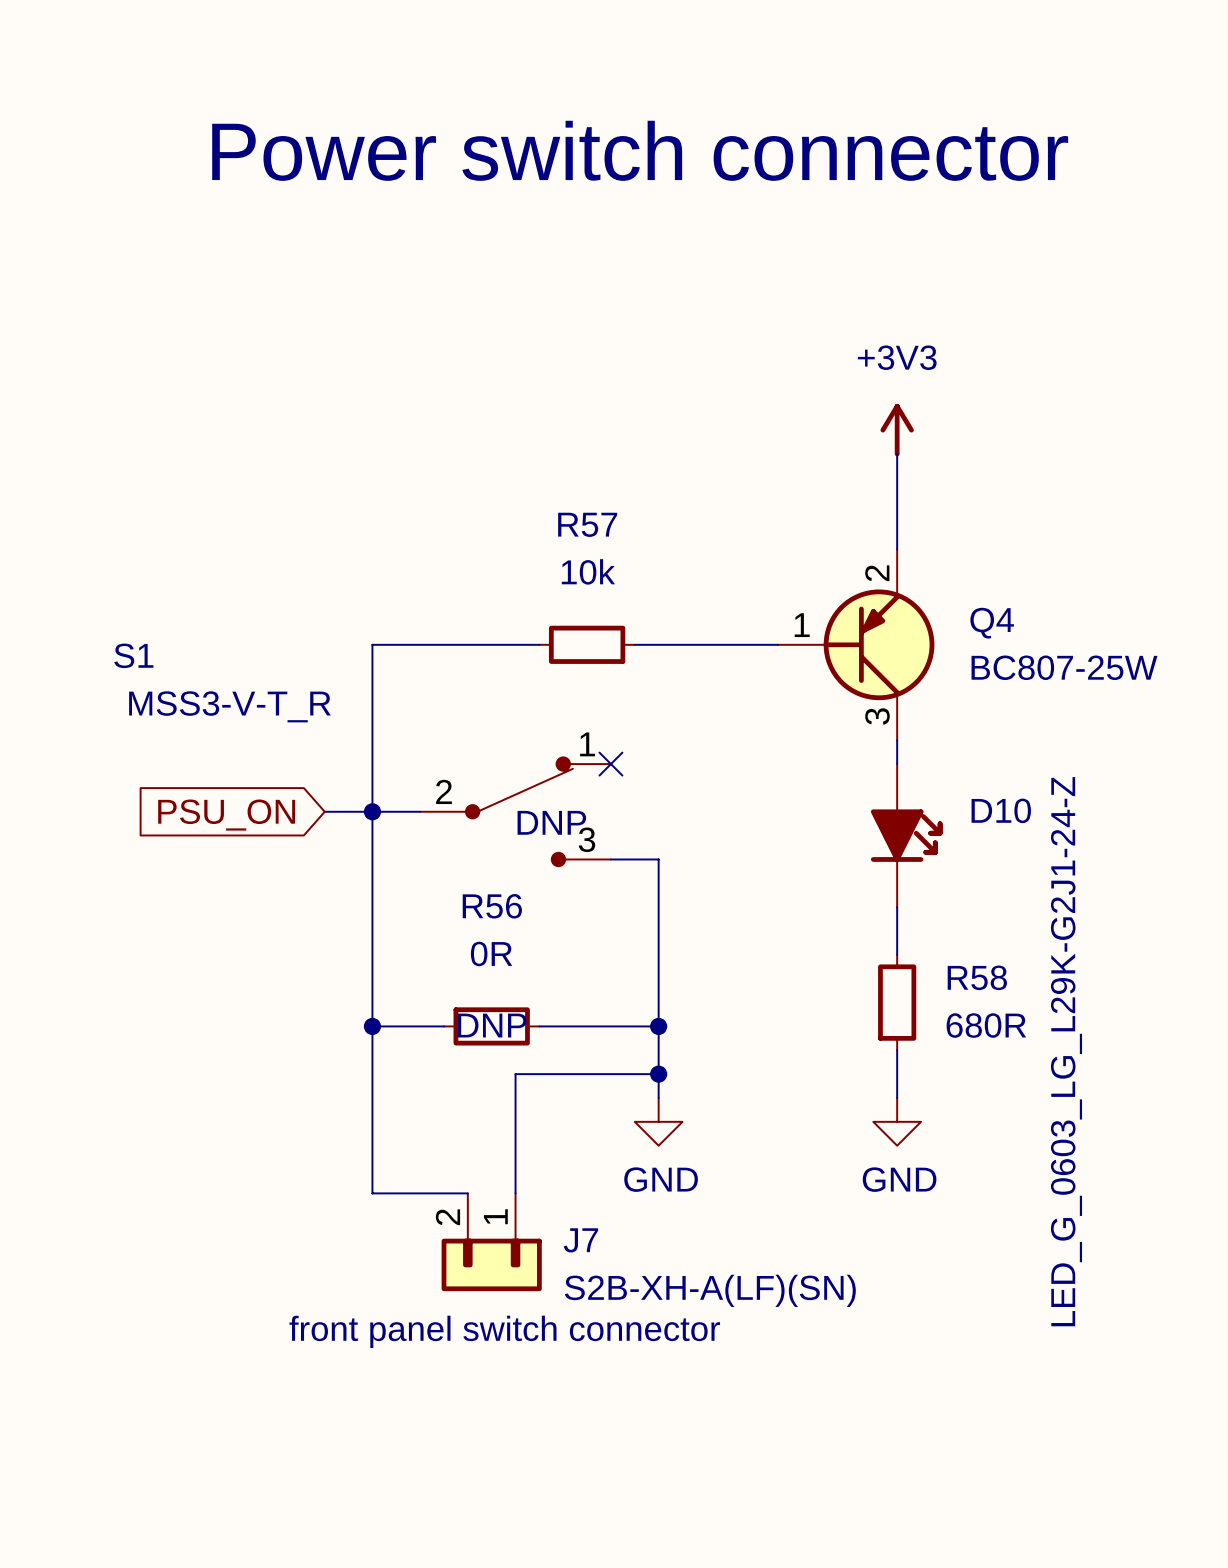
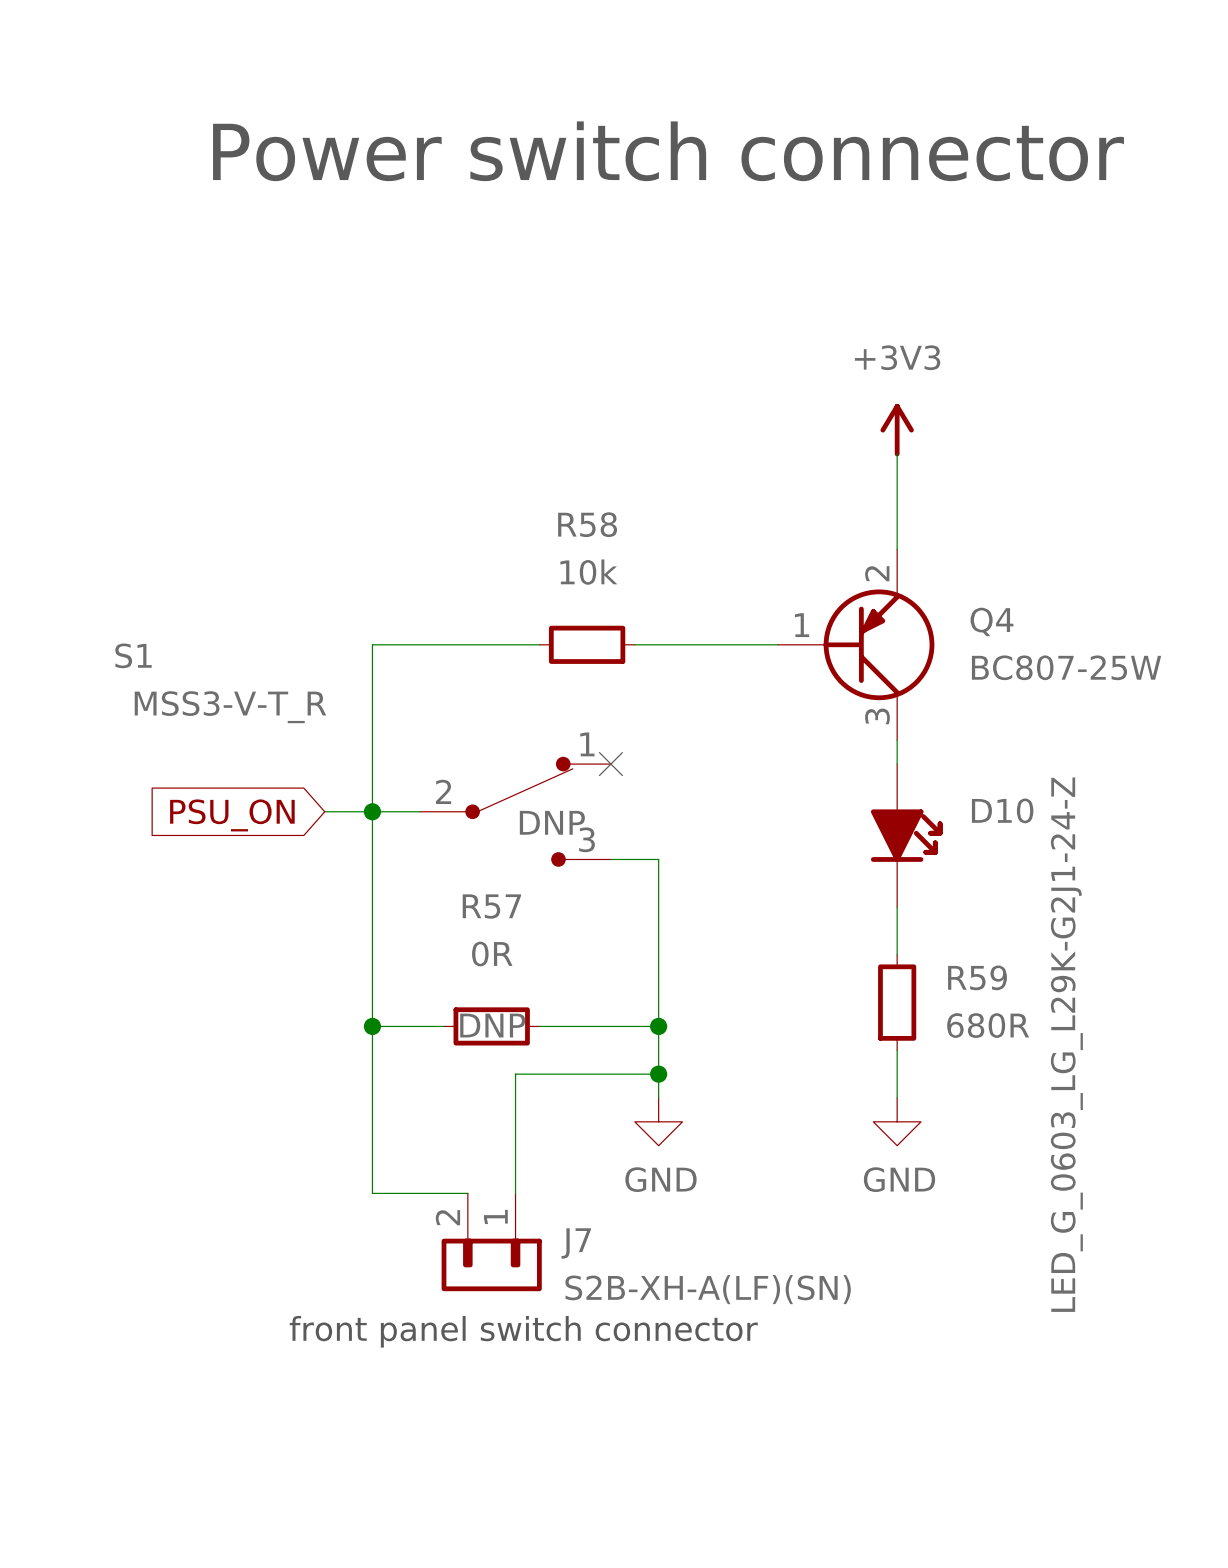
R57 name: R57 (587, 524) -> R58 (587, 524)
R56 name: R56 (492, 906) -> R57 (491, 906)
R58 name: R58 (977, 977) -> R59 (977, 977)

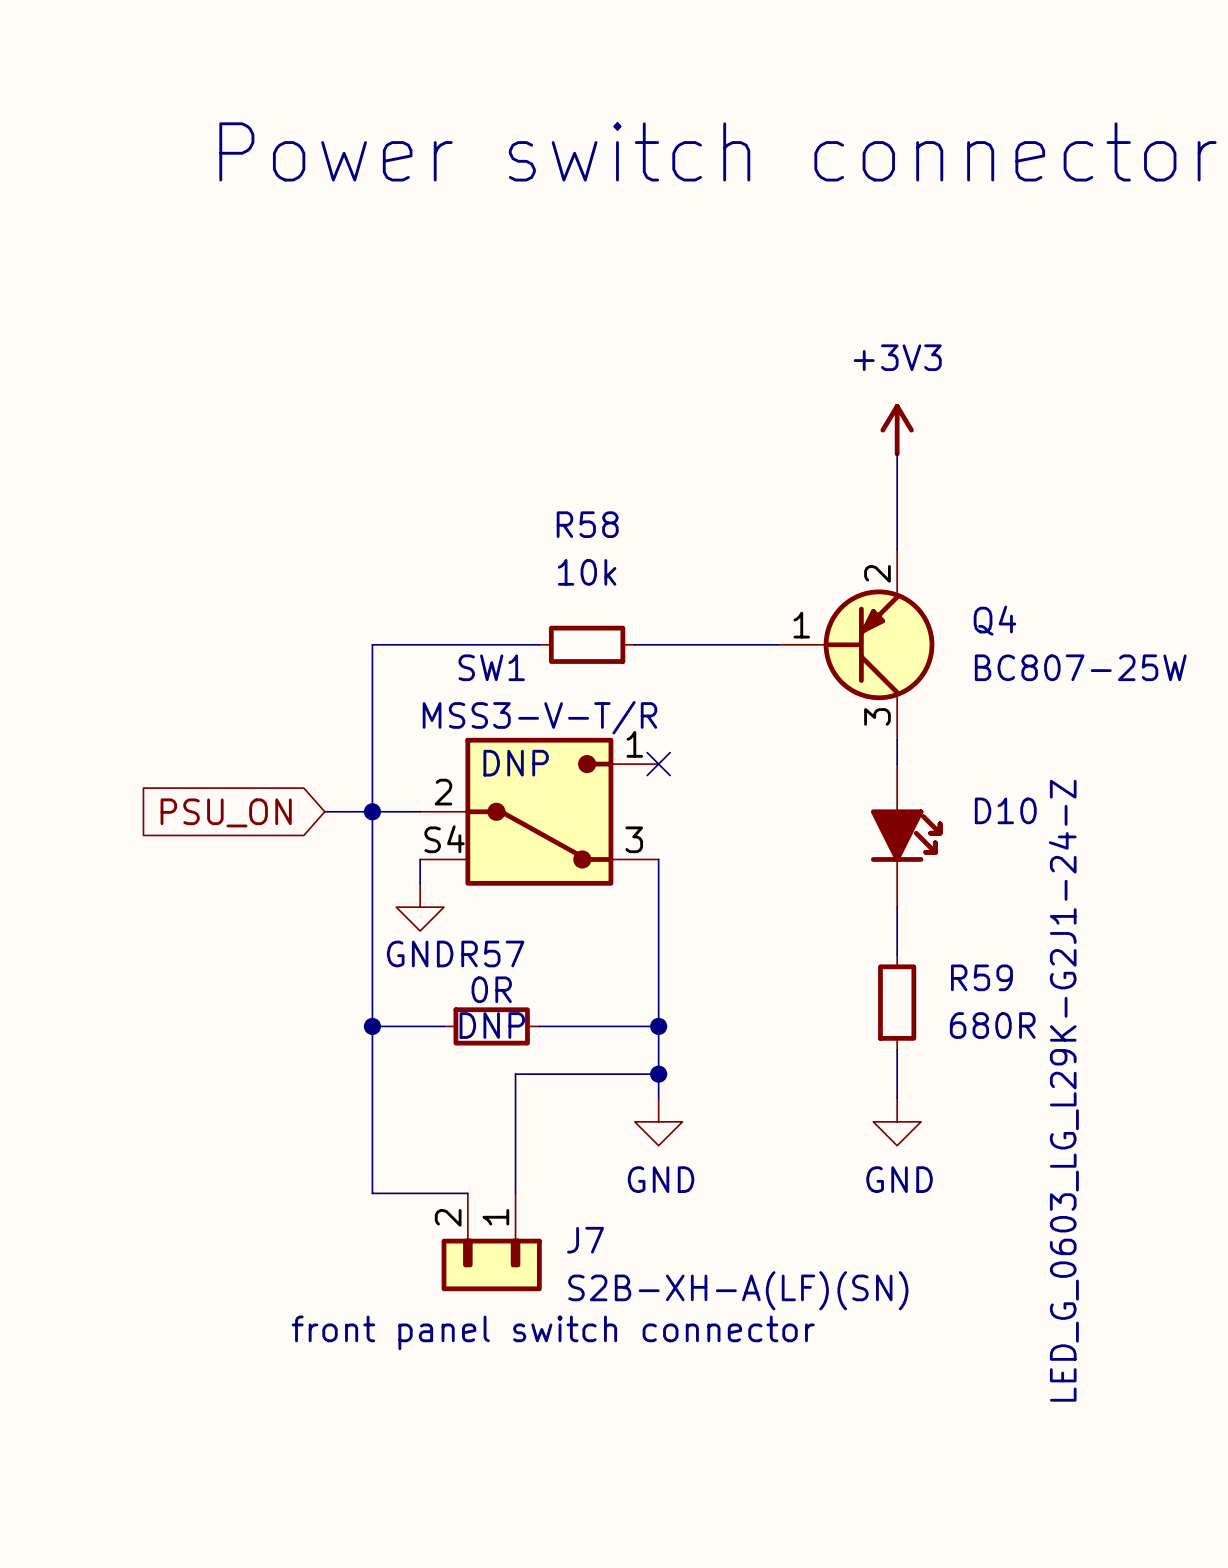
no-connect mark position: (610, 764) -> (658, 764)
S1: MSS3-V-T_R (515, 811) -> none
SW1: none -> (539, 811)
wire: none -> (420, 859) (420, 883)
R57 name position: R57 (491, 906) -> R57 (492, 953)
power symbol: none -> GND (420, 907)
R57 text position: 0R (492, 954) -> 0R (491, 989)

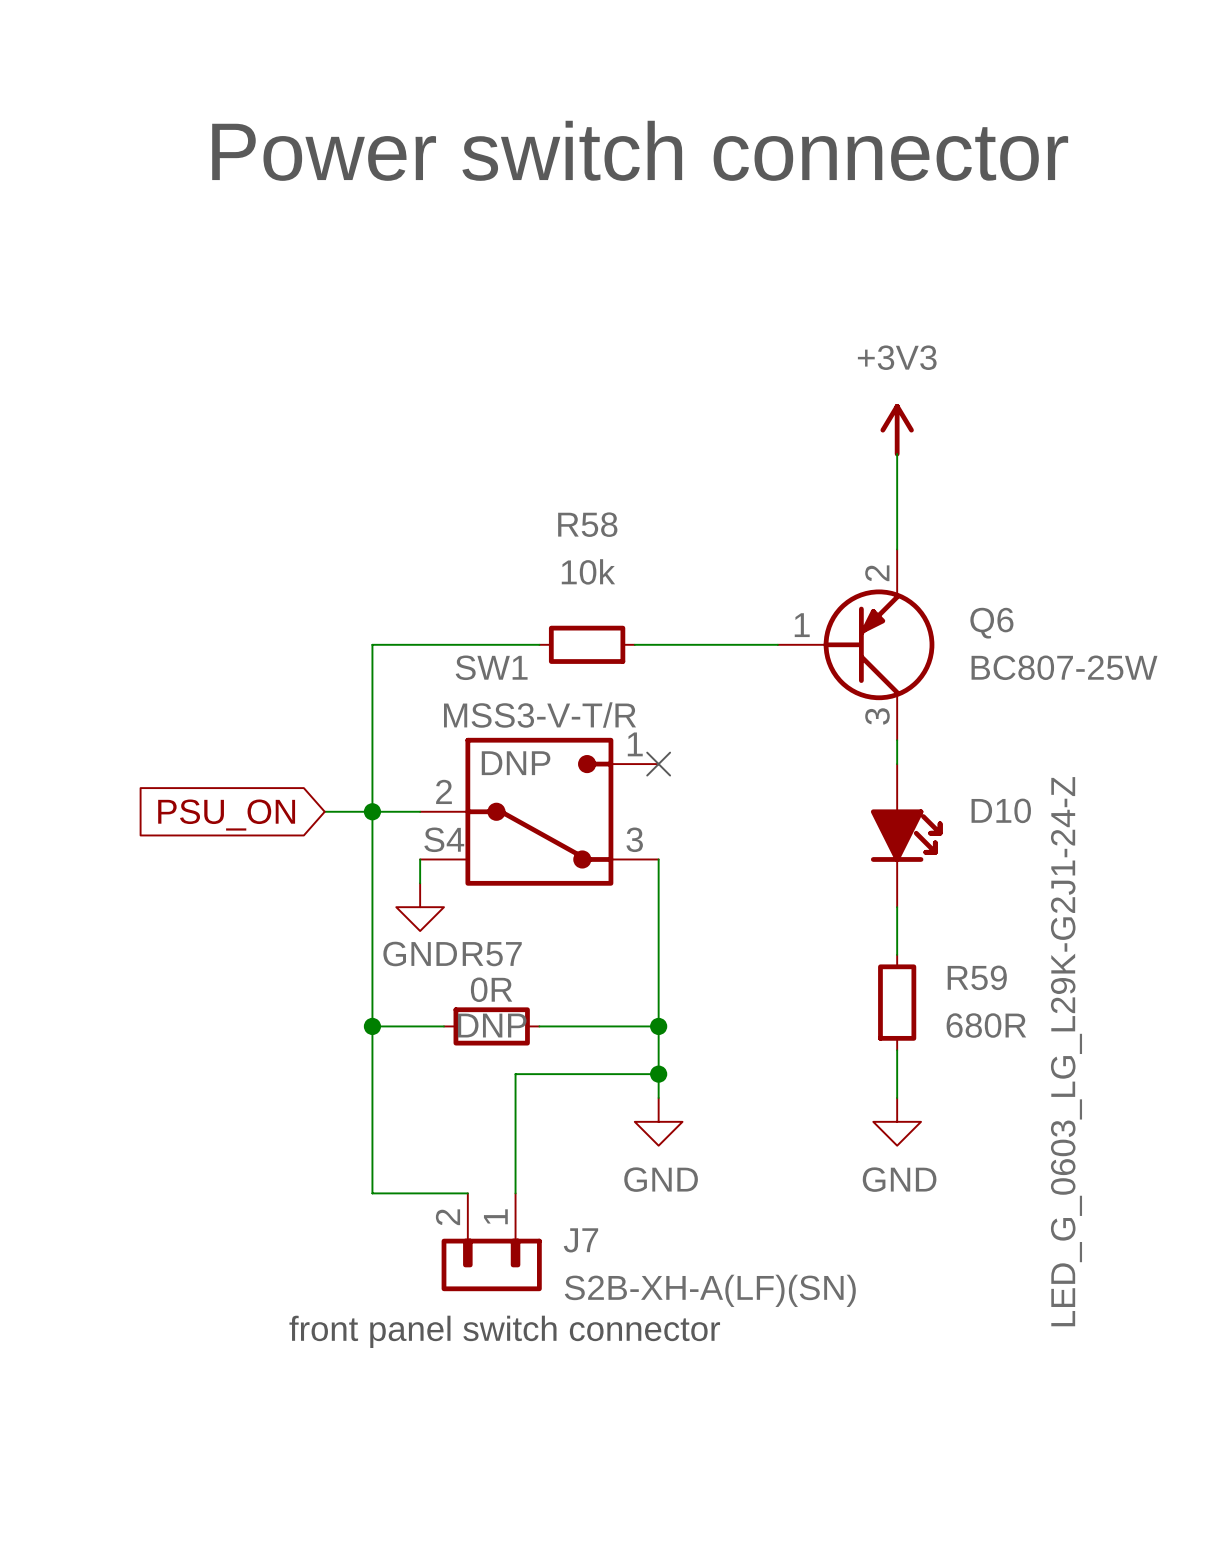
Q4 name: Q4 (994, 620) -> Q6 (991, 623)

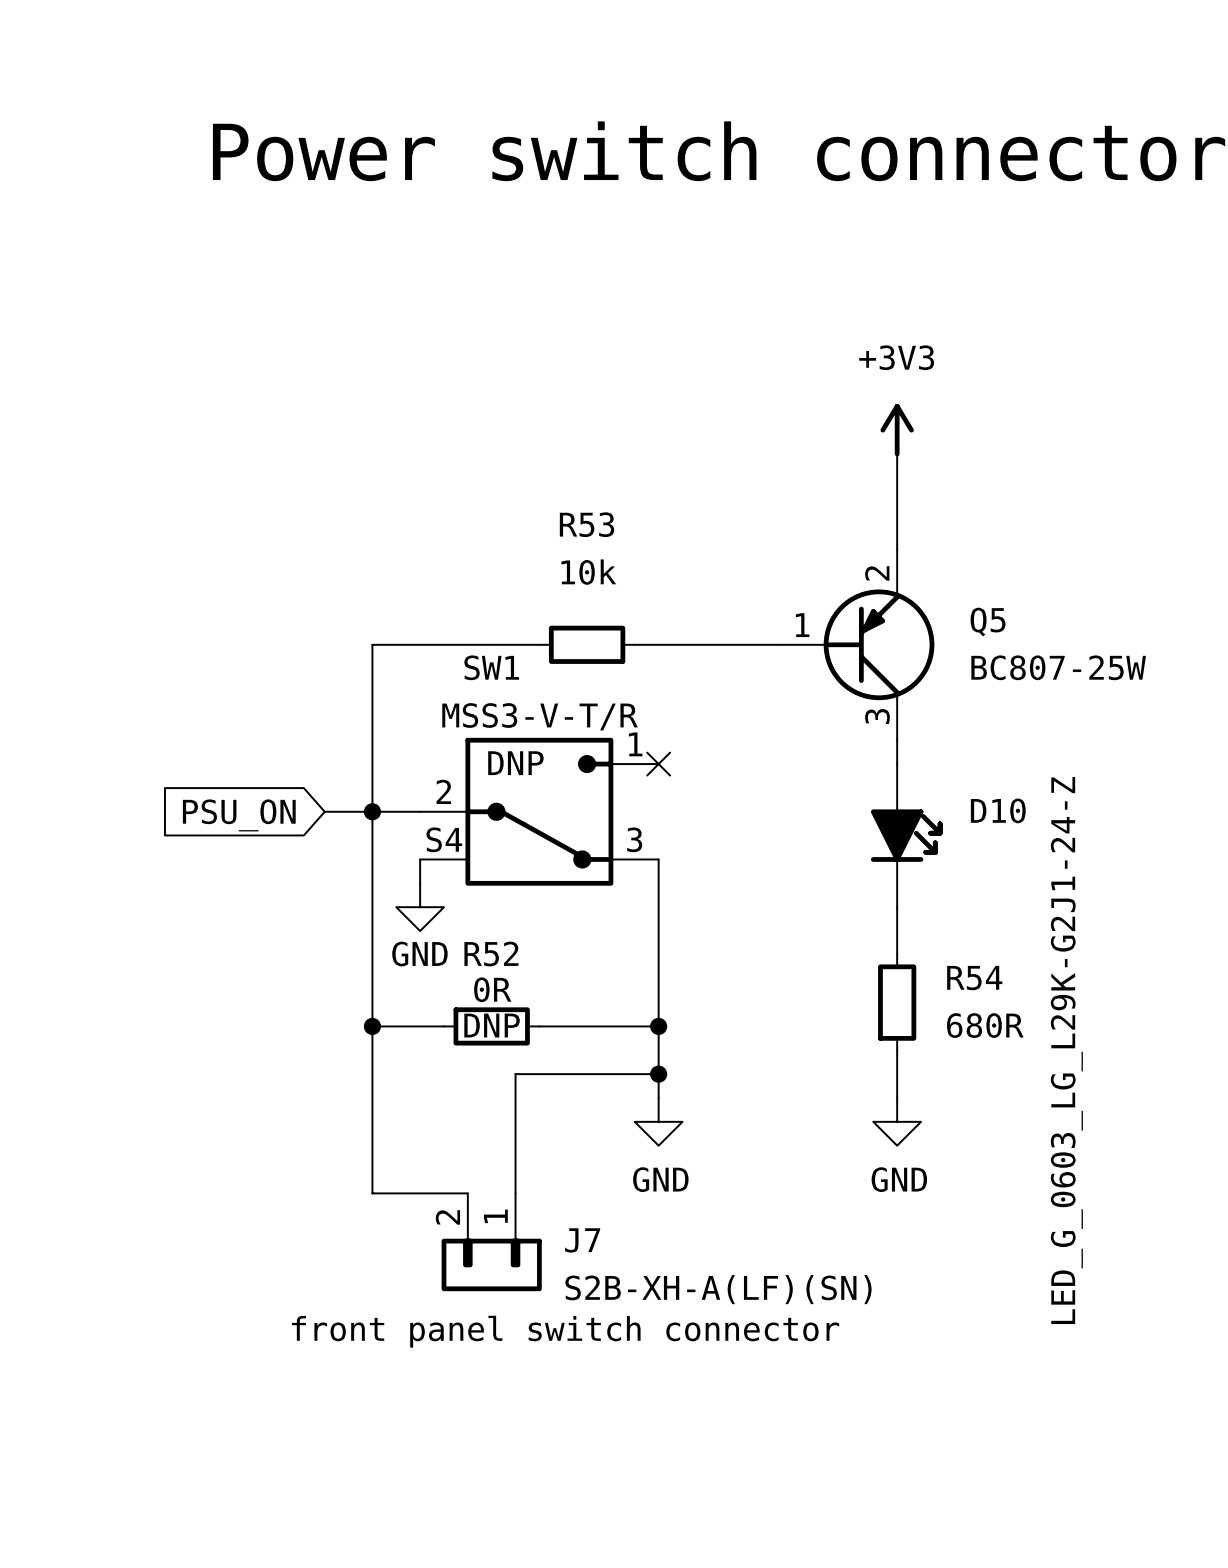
R58 name: R58 (587, 524) -> R53 (587, 524)
Q6 name: Q6 (991, 623) -> Q5 (988, 622)
R57 name: R57 (492, 954) -> R52 (491, 954)
R59 name: R59 (977, 977) -> R54 (974, 978)

